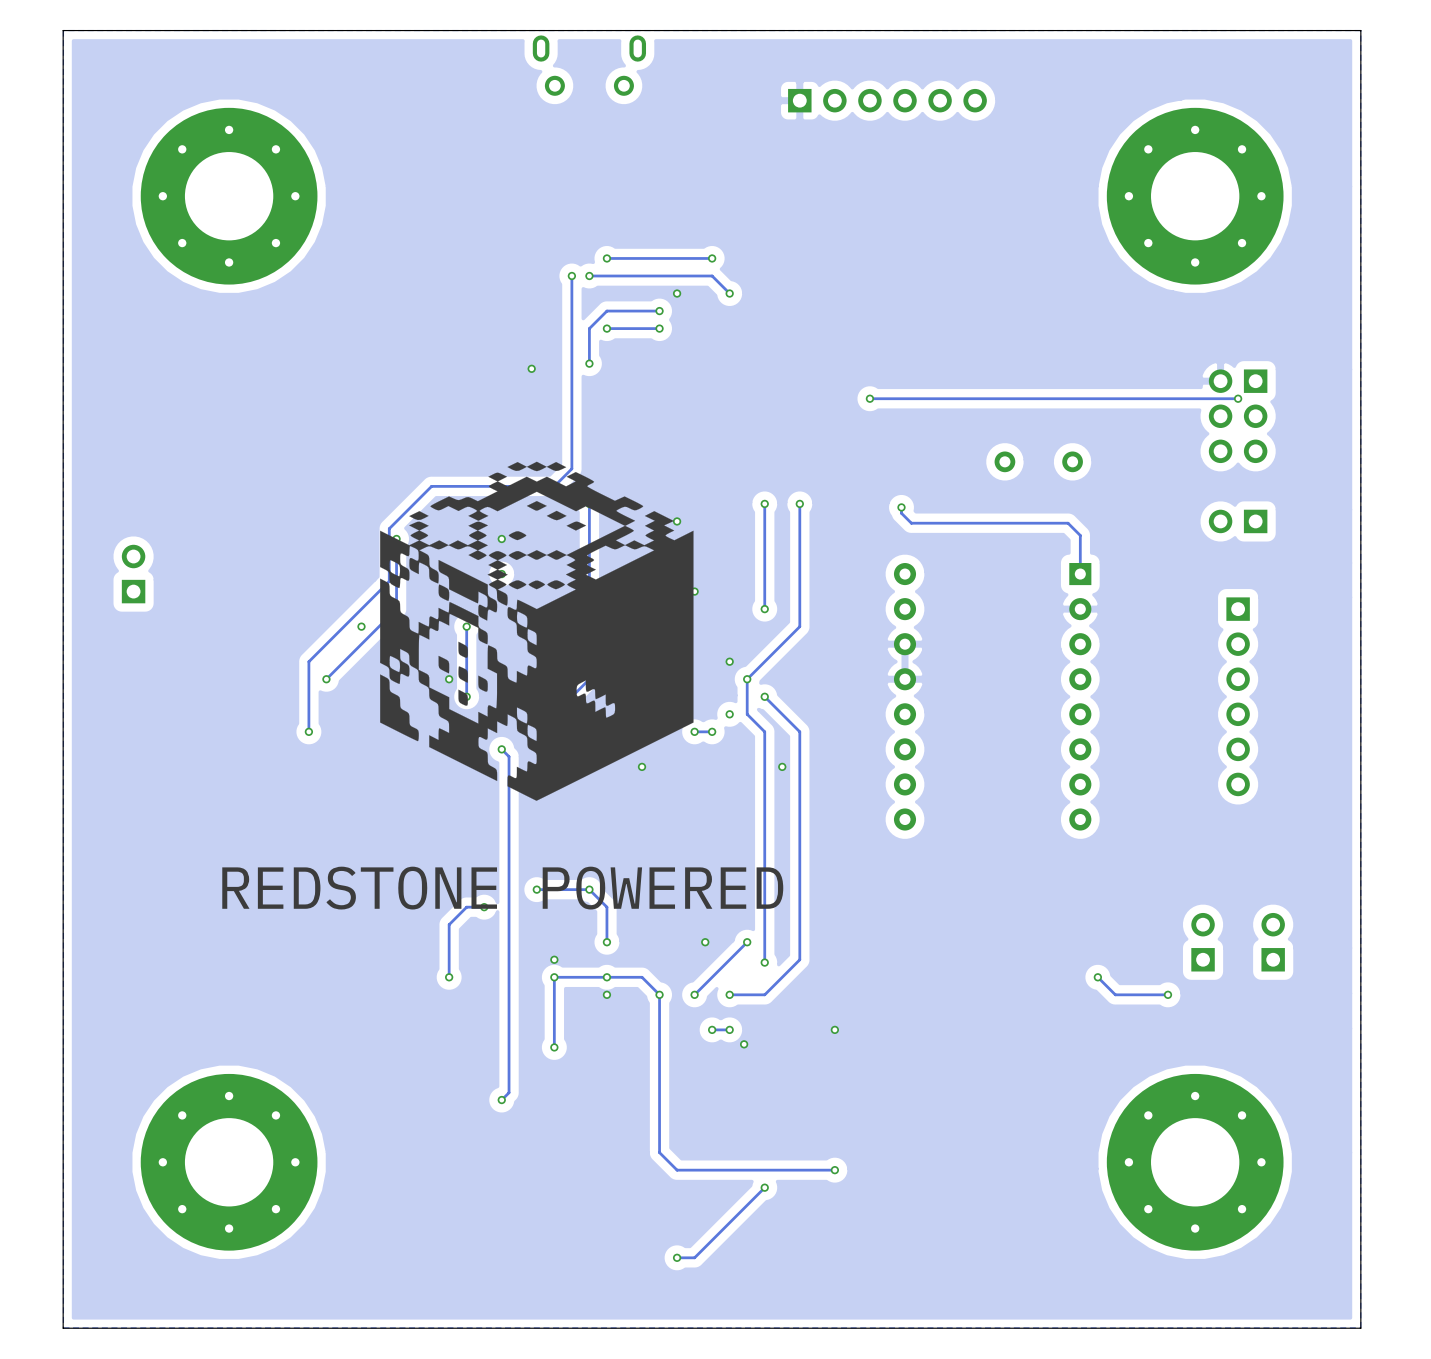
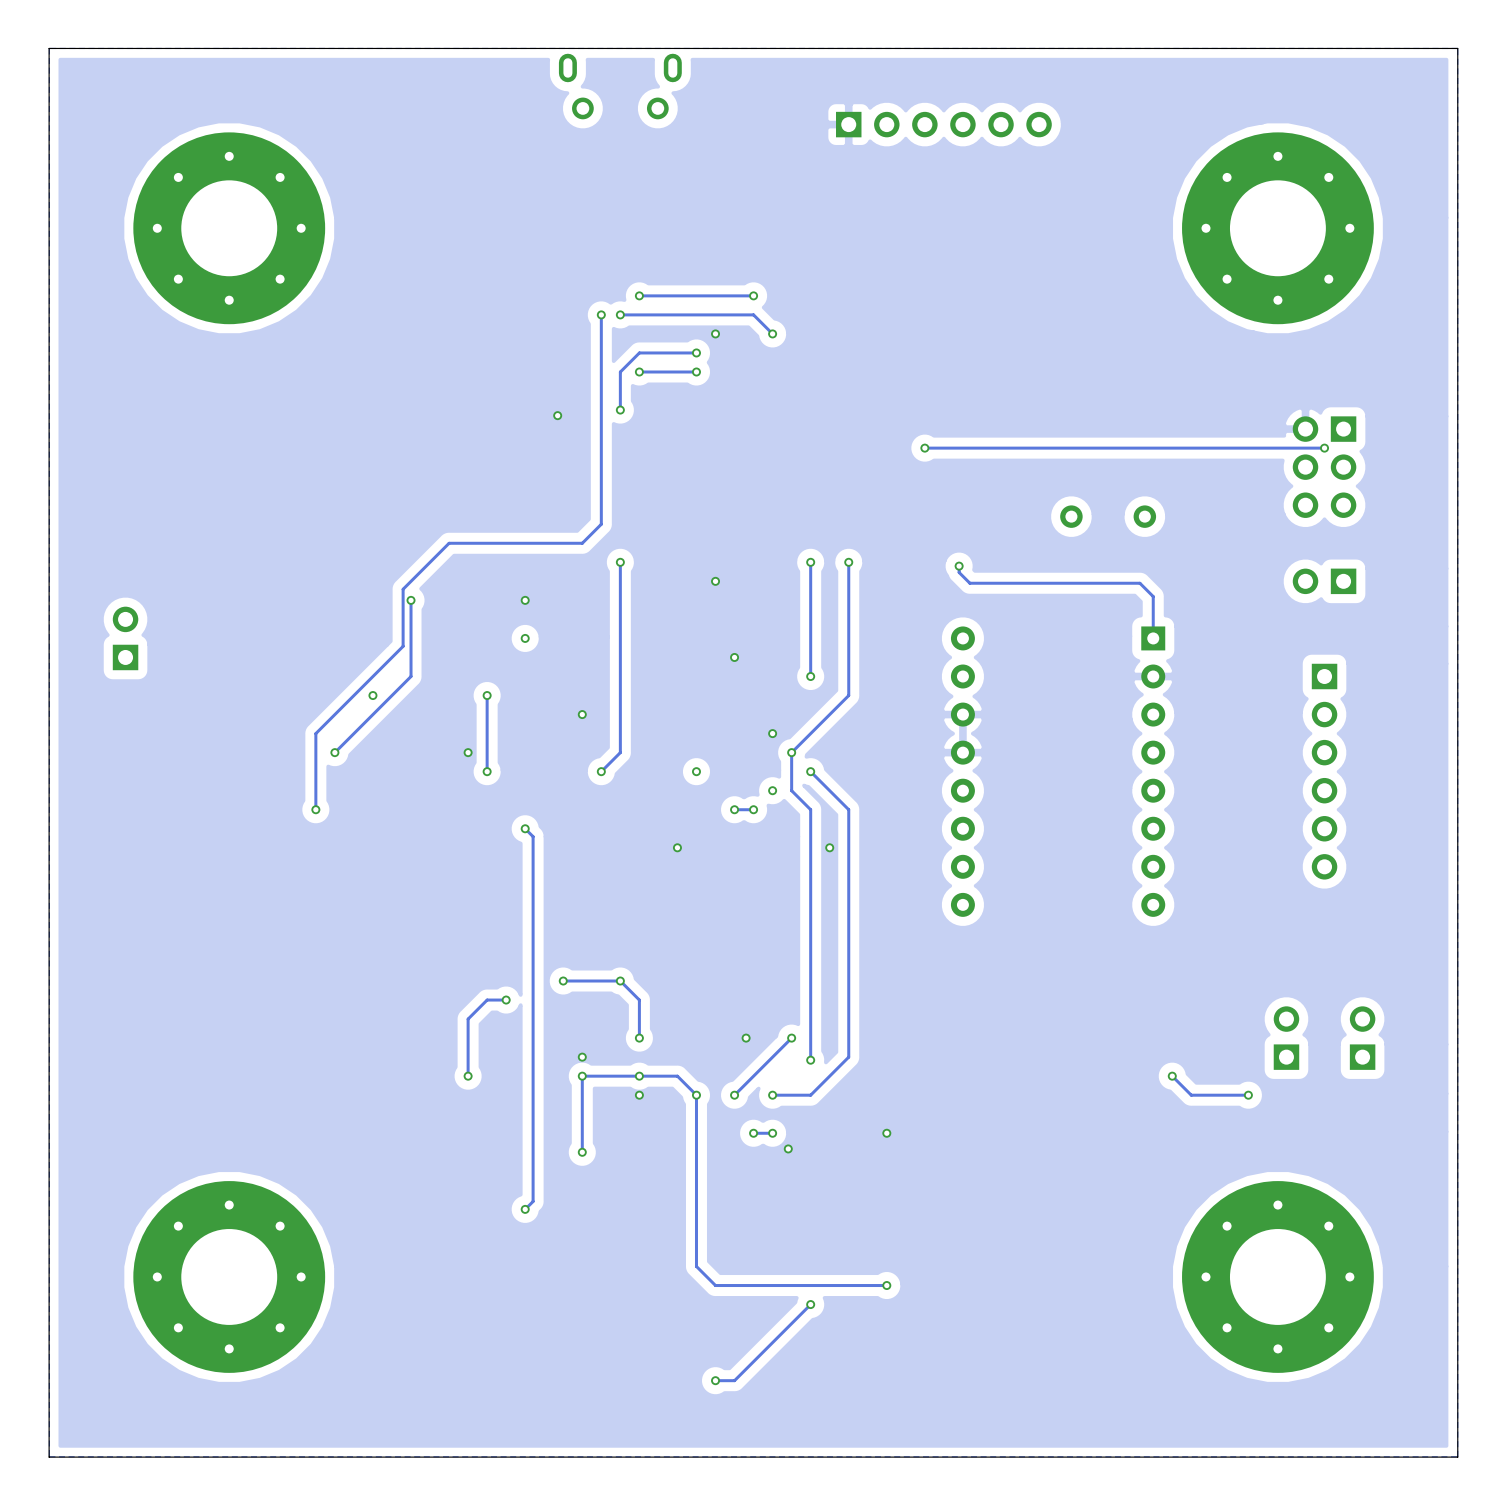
drawing: [380, 461, 694, 801] -> none
text: REDSTONE POWERED (502, 888) -> none

